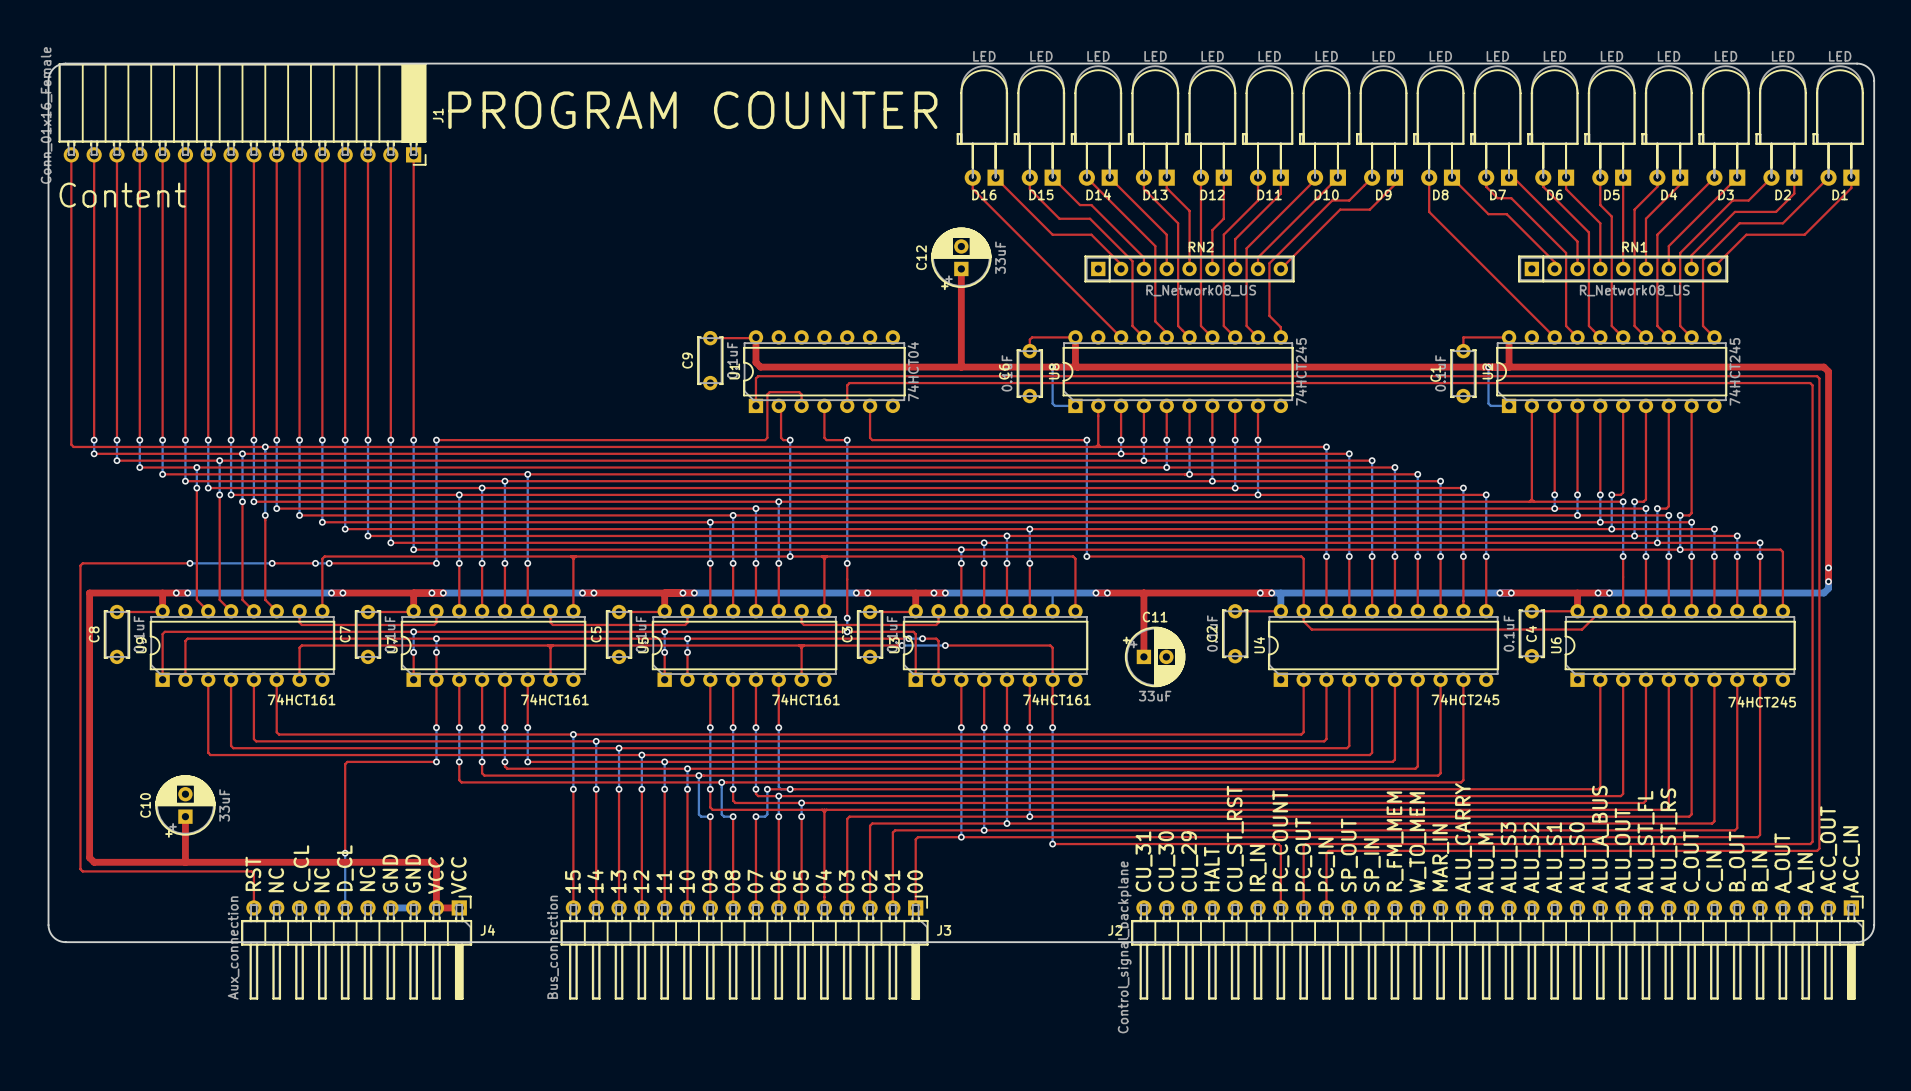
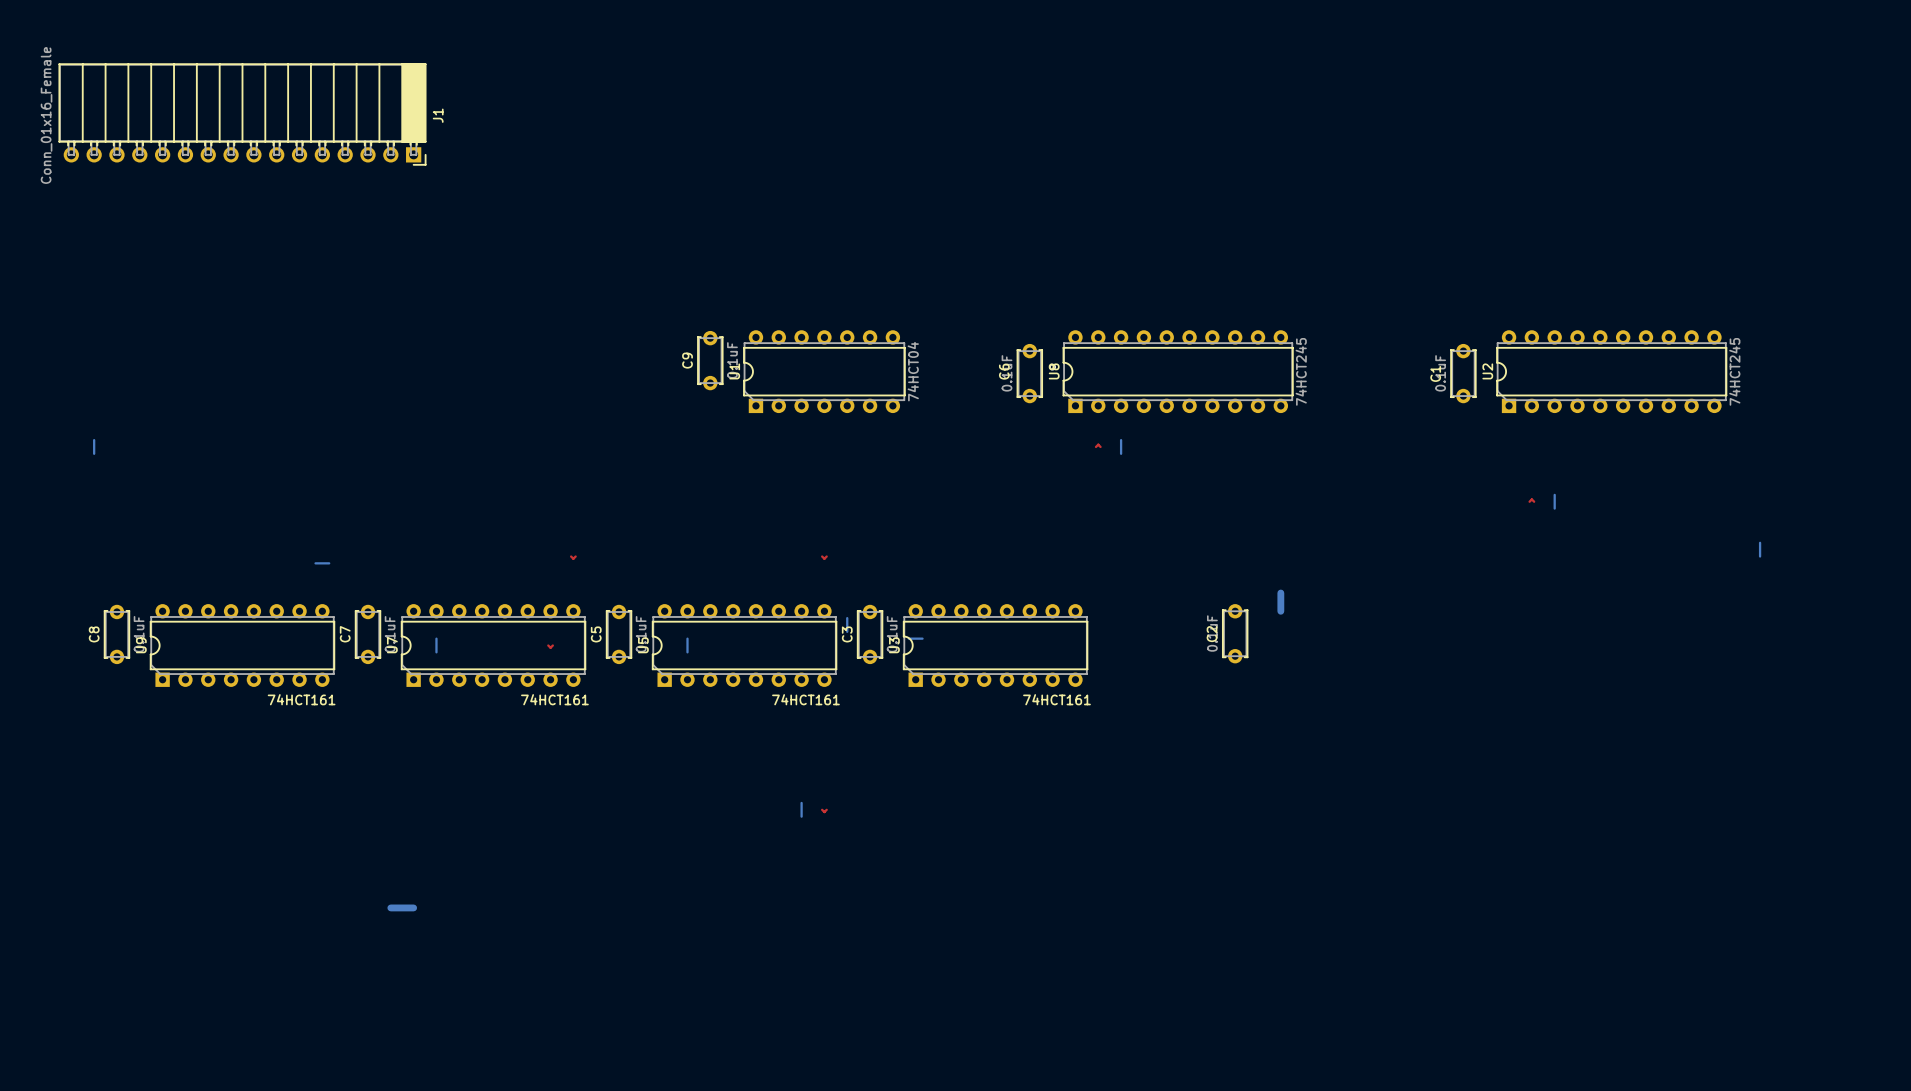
board edge: (65, 63) (1863, 64) (1871, 72) (1874, 80) (1872, 931) (1867, 938) (1857, 942) (59, 940) (52, 935) (48, 925) (48, 80) (53, 68) (65, 63) -> none
text: PROGRAM COUNTER (692, 110) -> none
D16: LED (982, 125) -> none
D15: LED (1039, 125) -> none
D14: LED (1096, 125) -> none
D13: LED (1153, 125) -> none
D12: LED (1210, 125) -> none
D11: LED (1267, 125) -> none
D10: LED (1324, 125) -> none
D9: LED (1381, 125) -> none
D8: LED (1438, 125) -> none
D7: LED (1495, 125) -> none
D6: LED (1552, 125) -> none
D5: LED (1609, 125) -> none
D4: LED (1666, 125) -> none
D3: LED (1724, 125) -> none
D2: LED (1781, 125) -> none
D1: LED (1838, 125) -> none
top track: (71, 154) (71, 444) (73, 446) (1326, 446) -> none
top track: (94, 154) (94, 440) -> none
top track: (116, 154) (116, 440) -> none
top track: (139, 154) (139, 440) -> none
top track: (162, 154) (162, 440) -> none
top track: (185, 154) (185, 440) -> none
top track: (208, 154) (208, 440) -> none
top track: (231, 154) (231, 440) -> none
top track: (253, 154) (253, 440) -> none
top track: (276, 154) (276, 440) -> none
top track: (299, 154) (299, 440) -> none
top track: (322, 154) (322, 440) -> none
top track: (345, 154) (345, 440) -> none
top track: (368, 154) (368, 440) -> none
top track: (390, 154) (390, 440) -> none
top track: (413, 154) (413, 440) -> none
top track: (1337, 175) (1337, 177) (1258, 257) (1258, 268) -> none
top track: (972, 177) (972, 189) (1121, 337) -> none
top track: (995, 177) (1052, 234) (1091, 234) (1121, 264) (1121, 268) -> none
top track: (1029, 177) (1029, 189) (1059, 218) (1090, 218) (1132, 261) (1132, 326) (1143, 337) -> none
top track: (1052, 177) (1080, 205) (1091, 205) (1143, 257) (1143, 268) -> none
top track: (1086, 177) (1155, 246) (1155, 321) (1166, 335) -> none
top track: (1109, 177) (1166, 234) (1166, 268) -> none
top track: (1143, 177) (1143, 189) (1178, 223) (1178, 326) (1189, 337) -> none
top track: (1166, 177) (1166, 188) (1189, 210) (1189, 268) -> none
top track: (1200, 177) (1200, 326) (1212, 337) -> none
top track: (1223, 177) (1223, 218) (1212, 230) (1212, 268) -> none
top track: (1258, 177) (1258, 200) (1223, 234) (1223, 326) (1235, 337) -> none
top track: (1280, 177) (1280, 193) (1235, 239) (1235, 268) -> none
top track: (1315, 177) (1315, 179) (1246, 248) (1246, 326) (1258, 337) -> none
top track: (1372, 177) (1349, 200) (1332, 200) (1269, 263) (1269, 315) (1280, 327) (1280, 337) -> none
top track: (1394, 177) (1394, 184) (1369, 209) (1340, 209) (1280, 268) -> none
top track: (1429, 177) (1429, 211) (1554, 337) -> none
top track: (1451, 177) (1488, 214) (1506, 214) (1554, 262) (1554, 268) -> none
top track: (1486, 177) (1486, 186) (1497, 198) (1511, 198) (1566, 252) (1566, 326) (1577, 337) -> none
top track: (1509, 177) (1513, 177) (1577, 241) (1577, 268) -> none
top track: (1543, 177) (1543, 186) (1588, 232) (1588, 326) (1600, 337) -> none
top track: (1566, 177) (1566, 189) (1600, 223) (1600, 268) -> none
top track: (1600, 177) (1600, 205) (1611, 216) (1611, 326) (1623, 337) -> none
top track: (1623, 177) (1623, 266) -> none
top track: (1657, 177) (1657, 186) (1634, 209) (1634, 326) (1645, 337) -> none
top track: (1714, 177) (1657, 234) (1657, 326) (1668, 337) -> none
top track: (1737, 177) (1668, 246) (1668, 268) -> none
top track: (1771, 177) (1748, 200) (1732, 200) (1680, 252) (1680, 326) (1691, 337) -> none
top track: (1794, 177) (1794, 193) (1776, 211) (1734, 211) (1691, 255) (1691, 268) -> none
top track: (1828, 177) (1782, 223) (1739, 223) (1703, 259) (1703, 326) (1714, 337) -> none
top track: (1851, 177) (1851, 188) (1804, 234) (1746, 234) (1714, 266) (1714, 268) -> none
top track: (1680, 179) (1680, 184) (1645, 218) (1645, 268) -> none
text: Content (122, 195) -> none
C12: 33uF (961, 258) -> none
top track: (961, 268) (961, 367) -> none
RN2: R_Network08_US (1189, 268) -> none
RN1: R_Network08_US (1623, 268) -> none
top track: (1509, 337) (1509, 367) -> none
top track: (1511, 337) (1463, 337) (1463, 351) -> none
top track: (710, 338) (755, 337) (755, 362) (760, 367) (1823, 367) (1828, 371) (1828, 581) -> none
top track: (1029, 351) (1029, 339) (1032, 337) (1075, 337) (1075, 364) (1077, 367) -> none
bottom track: (1052, 367) (1052, 403) (1054, 405) (1075, 405) -> none
bottom track: (1488, 367) (1488, 403) (1490, 405) (1509, 405) -> none
via: (1488, 367) -> none
top track: (755, 405) (755, 378) (758, 376) (1817, 376) (1819, 378) (1819, 848) (1817, 850) (1328, 850) (1326, 853) (1326, 907) -> none
top track: (778, 405) (781, 408) (781, 437) (783, 440) (790, 440) -> none
top track: (801, 405) (801, 394) (799, 392) (769, 392) (767, 394) (767, 437) (765, 440) (436, 440) -> none
top track: (824, 405) (824, 437) (826, 440) (847, 440) -> none
top track: (847, 405) (847, 385) (849, 383) (1810, 383) (1812, 385) (1812, 841) (1810, 844) (1305, 844) (1303, 846) (1303, 907) -> none
top track: (870, 405) (870, 437) (872, 440) (1086, 440) -> none
top track: (1098, 405) (1098, 446) -> none
top track: (1121, 405) (1121, 440) -> none
top track: (1143, 405) (1143, 440) -> none
top track: (1166, 405) (1166, 440) -> none
top track: (1189, 405) (1189, 440) -> none
top track: (1212, 405) (1212, 440) -> none
top track: (1235, 405) (1235, 440) -> none
top track: (1258, 405) (1258, 440) -> none
top track: (1554, 405) (1554, 494) -> none
top track: (1577, 405) (1577, 494) -> none
top track: (1600, 405) (1600, 494) -> none
top track: (1623, 405) (1623, 492) (1620, 494) (1611, 494) -> none
top track: (1645, 405) (1645, 499) (1643, 501) (1634, 501) -> none
top track: (1668, 405) (1668, 506) (1666, 508) (1657, 508) -> none
top track: (1691, 405) (1691, 513) (1689, 515) (1680, 515) -> none
top track: (1531, 408) (1531, 499) -> none
via: (94, 440) -> none
bottom track: (116, 440) (116, 460) -> none
via: (116, 440) -> none
bottom track: (139, 440) (139, 467) -> none
via: (139, 440) -> none
bottom track: (162, 440) (162, 474) -> none
via: (162, 440) -> none
bottom track: (185, 440) (185, 481) -> none
via: (185, 440) -> none
bottom track: (208, 440) (208, 488) -> none
via: (208, 440) -> none
bottom track: (231, 440) (231, 494) -> none
via: (231, 440) -> none
bottom track: (253, 440) (253, 501) -> none
via: (253, 440) -> none
bottom track: (276, 440) (276, 508) -> none
via: (276, 440) -> none
bottom track: (299, 440) (299, 515) -> none
via: (299, 440) -> none
bottom track: (322, 440) (322, 522) -> none
via: (322, 440) -> none
bottom track: (345, 440) (345, 529) -> none
via: (345, 440) -> none
bottom track: (368, 440) (368, 535) -> none
via: (368, 440) -> none
bottom track: (390, 440) (390, 542) -> none
via: (390, 440) -> none
bottom track: (413, 440) (413, 549) -> none
via: (413, 440) -> none
bottom track: (436, 440) (436, 563) -> none
via: (436, 440) -> none
bottom track: (790, 440) (790, 556) -> none
via: (790, 440) -> none
bottom track: (847, 440) (847, 563) -> none
via: (847, 440) -> none
bottom track: (1086, 440) (1086, 556) -> none
via: (1086, 440) -> none
via: (1121, 440) -> none
bottom track: (1143, 440) (1143, 460) -> none
via: (1143, 440) -> none
bottom track: (1166, 440) (1166, 467) -> none
via: (1166, 440) -> none
bottom track: (1189, 440) (1189, 474) -> none
via: (1189, 440) -> none
bottom track: (1212, 440) (1212, 481) -> none
via: (1212, 440) -> none
bottom track: (1235, 440) (1235, 488) -> none
via: (1235, 440) -> none
bottom track: (1258, 440) (1258, 494) -> none
via: (1258, 440) -> none
bottom track: (265, 446) (265, 515) -> none
via: (265, 446) -> none
bottom track: (1326, 446) (1326, 556) -> none
via: (1326, 446) -> none
top track: (94, 453) (1349, 453) -> none
via: (94, 453) -> none
bottom track: (242, 453) (242, 501) -> none
via: (242, 453) -> none
via: (1121, 453) -> none
bottom track: (1349, 453) (1349, 556) -> none
via: (1349, 453) -> none
top track: (116, 460) (1372, 460) -> none
via: (116, 460) -> none
bottom track: (219, 460) (219, 494) -> none
via: (219, 460) -> none
via: (1143, 460) -> none
bottom track: (1372, 460) (1372, 556) -> none
via: (1372, 460) -> none
top track: (139, 467) (1394, 467) -> none
via: (139, 467) -> none
bottom track: (196, 467) (196, 488) -> none
via: (196, 467) -> none
via: (1166, 467) -> none
bottom track: (1394, 467) (1394, 556) -> none
via: (1394, 467) -> none
top track: (162, 474) (1417, 474) -> none
via: (162, 474) -> none
bottom track: (527, 474) (527, 563) -> none
via: (527, 474) -> none
via: (1189, 474) -> none
bottom track: (1417, 474) (1417, 556) -> none
via: (1417, 474) -> none
top track: (185, 481) (1440, 481) -> none
via: (185, 481) -> none
bottom track: (504, 481) (504, 563) -> none
via: (504, 481) -> none
via: (1212, 481) -> none
bottom track: (1440, 481) (1440, 556) -> none
via: (1440, 481) -> none
top track: (196, 488) (196, 599) (208, 611) -> none
via: (196, 488) -> none
top track: (208, 488) (1463, 488) -> none
via: (208, 488) -> none
bottom track: (482, 488) (482, 563) -> none
via: (482, 488) -> none
via: (1235, 488) -> none
bottom track: (1463, 488) (1463, 556) -> none
via: (1463, 488) -> none
top track: (219, 494) (219, 599) (231, 611) -> none
via: (219, 494) -> none
top track: (231, 494) (1486, 494) -> none
via: (231, 494) -> none
bottom track: (459, 494) (459, 563) -> none
via: (459, 494) -> none
via: (1258, 494) -> none
bottom track: (1486, 494) (1486, 556) -> none
via: (1486, 494) -> none
via: (1554, 494) -> none
bottom track: (1577, 494) (1577, 515) -> none
via: (1577, 494) -> none
bottom track: (1600, 494) (1600, 522) -> none
via: (1600, 494) -> none
bottom track: (1611, 494) (1611, 529) -> none
via: (1611, 494) -> none
top track: (242, 501) (242, 599) (253, 611) -> none
via: (242, 501) -> none
top track: (253, 501) (1623, 501) -> none
via: (253, 501) -> none
bottom track: (778, 501) (778, 563) -> none
via: (778, 501) -> none
bottom track: (1623, 501) (1623, 556) -> none
via: (1623, 501) -> none
bottom track: (1634, 501) (1634, 535) -> none
via: (1634, 501) -> none
top track: (276, 508) (1645, 508) -> none
via: (276, 508) -> none
bottom track: (755, 508) (755, 563) -> none
via: (755, 508) -> none
via: (1554, 508) -> none
bottom track: (1645, 508) (1645, 556) -> none
via: (1645, 508) -> none
bottom track: (1657, 508) (1657, 542) -> none
via: (1657, 508) -> none
top track: (265, 515) (265, 599) (276, 611) -> none
via: (265, 515) -> none
top track: (299, 515) (1668, 515) -> none
via: (299, 515) -> none
bottom track: (733, 515) (733, 563) -> none
via: (733, 515) -> none
via: (1577, 515) -> none
bottom track: (1668, 515) (1668, 556) -> none
via: (1668, 515) -> none
bottom track: (1680, 515) (1680, 549) -> none
via: (1680, 515) -> none
top track: (322, 522) (1691, 522) -> none
via: (322, 522) -> none
bottom track: (710, 522) (710, 563) -> none
via: (710, 522) -> none
via: (1600, 522) -> none
bottom track: (1691, 522) (1691, 556) -> none
via: (1691, 522) -> none
top track: (345, 529) (1714, 529) -> none
via: (345, 529) -> none
bottom track: (1029, 529) (1029, 563) -> none
via: (1029, 529) -> none
via: (1611, 529) -> none
bottom track: (1714, 529) (1714, 556) -> none
via: (1714, 529) -> none
top track: (368, 535) (1737, 535) -> none
via: (368, 535) -> none
bottom track: (1006, 535) (1006, 563) -> none
via: (1006, 535) -> none
via: (1634, 535) -> none
bottom track: (1737, 535) (1737, 556) -> none
via: (1737, 535) -> none
top track: (390, 542) (1760, 542) -> none
via: (390, 542) -> none
bottom track: (984, 542) (984, 563) -> none
via: (984, 542) -> none
via: (1657, 542) -> none
via: (1760, 542) -> none
top track: (413, 549) (1780, 549) (1782, 551) (1782, 611) -> none
via: (413, 549) -> none
bottom track: (961, 549) (961, 563) -> none
via: (961, 549) -> none
via: (1680, 549) -> none
top track: (573, 556) (573, 611) -> none
via: (790, 556) -> none
top track: (824, 556) (824, 611) -> none
top track: (1086, 556) (1301, 556) (1303, 558) (1303, 621) (1311, 629) (1582, 629) (1600, 611) -> none
via: (1086, 556) -> none
top track: (1326, 556) (1326, 611) -> none
via: (1326, 556) -> none
top track: (1349, 556) (1349, 611) -> none
via: (1349, 556) -> none
top track: (1372, 556) (1372, 611) -> none
via: (1372, 556) -> none
top track: (1394, 556) (1394, 611) -> none
via: (1394, 556) -> none
top track: (1417, 556) (1417, 611) -> none
via: (1417, 556) -> none
top track: (1440, 556) (1440, 611) -> none
via: (1440, 556) -> none
top track: (1463, 556) (1463, 611) -> none
via: (1463, 556) -> none
top track: (1486, 556) (1486, 611) -> none
via: (1486, 556) -> none
top track: (1623, 556) (1623, 613) -> none
via: (1623, 556) -> none
top track: (1645, 556) (1645, 611) -> none
via: (1645, 556) -> none
top track: (1668, 556) (1668, 611) -> none
via: (1668, 556) -> none
top track: (1691, 556) (1691, 611) -> none
via: (1691, 556) -> none
top track: (1714, 556) (1714, 611) -> none
via: (1714, 556) -> none
top track: (1737, 556) (1737, 611) -> none
via: (1737, 556) -> none
top track: (1760, 556) (1760, 611) -> none
via: (1760, 556) -> none
bottom track: (190, 563) (272, 563) -> none
top track: (190, 563) (82, 563) (80, 565) (80, 869) (82, 871) (251, 871) (253, 873) (253, 907) -> none
via: (190, 563) -> none
top track: (272, 563) (315, 563) -> none
via: (272, 563) -> none
via: (315, 563) -> none
top track: (329, 563) (436, 563) -> none
via: (329, 563) -> none
via: (436, 563) -> none
top track: (459, 563) (459, 611) -> none
via: (459, 563) -> none
top track: (482, 563) (482, 611) -> none
via: (482, 563) -> none
top track: (504, 563) (504, 611) -> none
via: (504, 563) -> none
top track: (527, 563) (527, 611) -> none
via: (527, 563) -> none
top track: (710, 563) (710, 611) -> none
via: (710, 563) -> none
top track: (733, 563) (733, 611) -> none
via: (733, 563) -> none
top track: (755, 563) (755, 611) -> none
via: (755, 563) -> none
top track: (778, 563) (778, 611) -> none
via: (778, 563) -> none
top track: (847, 563) (847, 618) -> none
via: (847, 563) -> none
top track: (961, 563) (961, 611) -> none
via: (961, 563) -> none
top track: (984, 563) (984, 611) -> none
via: (984, 563) -> none
top track: (1006, 563) (1006, 611) -> none
via: (1006, 563) -> none
top track: (1029, 563) (1029, 611) -> none
via: (1029, 563) -> none
bottom track: (1828, 567) (1828, 588) (1823, 593) (1598, 593) -> none
via: (1828, 567) -> none
via: (1828, 581) -> none
top track: (162, 593) (161, 611) (116, 611) -> none
bottom track: (176, 593) (342, 593) -> none
via: (176, 593) -> none
top track: (187, 593) (89, 593) (89, 857) (94, 862) (431, 862) (436, 866) (436, 907) (459, 907) -> none
via: (187, 593) -> none
top track: (331, 593) (443, 593) -> none
via: (331, 593) -> none
via: (342, 593) -> none
top track: (413, 593) (412, 611) (368, 611) -> none
bottom track: (431, 593) (593, 593) -> none
via: (431, 593) -> none
via: (443, 593) -> none
top track: (582, 593) (694, 593) -> none
via: (582, 593) -> none
via: (593, 593) -> none
top track: (664, 593) (663, 611) (619, 611) -> none
bottom track: (682, 593) (867, 593) -> none
via: (682, 593) -> none
via: (694, 593) -> none
top track: (856, 593) (945, 593) -> none
via: (856, 593) -> none
via: (867, 593) -> none
top track: (915, 593) (914, 611) (870, 611) -> none
bottom track: (933, 593) (1107, 593) -> none
via: (933, 593) -> none
via: (945, 593) -> none
bottom track: (1052, 593) (1052, 611) -> none
top track: (1095, 593) (1271, 593) -> none
via: (1095, 593) -> none
via: (1107, 593) -> none
top track: (1143, 593) (1143, 656) -> none
bottom track: (1260, 593) (1511, 593) -> none
via: (1260, 593) -> none
via: (1271, 593) -> none
top track: (1499, 593) (1609, 593) -> none
via: (1499, 593) -> none
via: (1511, 593) -> none
top track: (1577, 593) (1577, 611) (1531, 611) -> none
via: (1598, 593) -> none
via: (1609, 593) -> none
top track: (299, 611) (299, 622) (301, 624) (434, 624) (436, 622) (436, 611) -> none
top track: (322, 611) (322, 558) (324, 556) (1073, 556) (1075, 558) (1075, 611) -> none
top track: (550, 611) (550, 622) (552, 624) (685, 624) (687, 622) (687, 611) -> none
top track: (801, 611) (801, 622) (803, 624) (936, 624) (938, 622) (938, 611) -> none
top track: (1235, 611) (1280, 611) -> none
via: (847, 618) -> none
bottom track: (413, 631) (413, 652) -> none
via: (413, 631) -> none
bottom track: (664, 631) (664, 652) -> none
via: (664, 631) -> none
via: (847, 631) -> none
C4: 0.1uF (1531, 633) -> none
via: (436, 638) -> none
via: (687, 638) -> none
top track: (908, 638) (187, 638) (185, 640) (185, 679) -> none
via: (908, 638) -> none
top track: (922, 638) (936, 638) (938, 640) (938, 679) -> none
via: (922, 638) -> none
top track: (550, 645) (550, 679) -> none
top track: (799, 645) (801, 647) (803, 645) -> none
top track: (801, 645) (801, 679) -> none
bottom track: (902, 645) (945, 645) -> none
top track: (902, 645) (301, 645) (299, 647) (299, 679) -> none
via: (902, 645) -> none
top track: (945, 645) (1050, 645) (1052, 647) (1052, 727) -> none
via: (945, 645) -> none
U4: 74HCT245 (1383, 645) -> none
U6: 74HCT245 (1680, 645) -> none
top track: (413, 652) (413, 679) -> none
via: (413, 652) -> none
top track: (436, 652) (436, 727) -> none
via: (436, 652) -> none
top track: (664, 652) (664, 679) -> none
via: (664, 652) -> none
top track: (687, 652) (687, 679) -> none
via: (687, 652) -> none
C11: 33uF (1154, 656) -> none
top track: (253, 677) (253, 739) (256, 741) (1324, 741) (1326, 739) (1326, 679) -> none
top track: (162, 679) (162, 634) (164, 631) (913, 631) (915, 634) (915, 679) -> none
top track: (208, 679) (208, 752) (210, 755) (1369, 755) (1372, 752) (1372, 679) -> none
top track: (231, 679) (231, 745) (233, 748) (1347, 748) (1349, 745) (1349, 679) -> none
top track: (276, 679) (276, 732) (279, 734) (1301, 734) (1303, 732) (1303, 679) -> none
top track: (459, 679) (459, 727) -> none
top track: (482, 679) (482, 727) -> none
top track: (504, 679) (504, 727) -> none
top track: (527, 679) (527, 727) -> none
top track: (710, 679) (710, 727) -> none
top track: (733, 679) (733, 727) -> none
top track: (755, 679) (755, 727) -> none
top track: (778, 679) (778, 727) -> none
top track: (961, 679) (961, 727) -> none
top track: (984, 679) (984, 727) -> none
top track: (1006, 679) (1006, 727) -> none
top track: (1029, 679) (1029, 727) -> none
top track: (1394, 679) (1394, 759) (1392, 761) (527, 761) -> none
top track: (1417, 679) (1417, 766) (1415, 768) (507, 768) (504, 761) -> none
top track: (1440, 679) (1440, 773) (1438, 775) (484, 775) (482, 773) (482, 761) -> none
top track: (1463, 679) (1463, 780) (1461, 782) (461, 782) (459, 780) (459, 761) -> none
top track: (1600, 679) (1600, 786) (1598, 789) (767, 789) -> none
top track: (1623, 679) (1623, 793) (1620, 796) (758, 796) (755, 789) -> none
top track: (1645, 679) (1645, 800) (1643, 802) (735, 802) (733, 800) (733, 789) -> none
top track: (1668, 679) (1668, 807) (1666, 809) (712, 809) (710, 807) (710, 789) -> none
top track: (1691, 679) (1691, 814) (1689, 816) (849, 816) (847, 818) (847, 907) -> none
top track: (1714, 679) (1714, 821) (1712, 823) (872, 823) (870, 825) (870, 907) -> none
top track: (1737, 679) (1737, 828) (1734, 830) (895, 830) (892, 832) (892, 907) -> none
top track: (1760, 679) (1760, 834) (1757, 837) (917, 837) (915, 839) (915, 907) -> none
bottom track: (436, 727) (436, 761) -> none
via: (436, 727) -> none
bottom track: (459, 727) (459, 761) -> none
via: (459, 727) -> none
bottom track: (482, 727) (482, 761) -> none
via: (482, 727) -> none
bottom track: (504, 727) (504, 761) -> none
via: (504, 727) -> none
bottom track: (527, 727) (527, 761) -> none
via: (527, 727) -> none
bottom track: (710, 727) (710, 789) -> none
via: (710, 727) -> none
bottom track: (733, 727) (733, 789) -> none
via: (733, 727) -> none
bottom track: (755, 727) (755, 789) -> none
via: (755, 727) -> none
bottom track: (778, 727) (778, 786) (781, 789) (790, 789) -> none
via: (778, 727) -> none
bottom track: (961, 727) (961, 837) -> none
via: (961, 727) -> none
bottom track: (984, 727) (984, 830) -> none
via: (984, 727) -> none
bottom track: (1006, 727) (1006, 823) -> none
via: (1006, 727) -> none
bottom track: (1029, 727) (1029, 816) -> none
via: (1029, 727) -> none
bottom track: (1052, 727) (1052, 844) -> none
via: (1052, 727) -> none
bottom track: (573, 734) (573, 789) -> none
via: (573, 734) -> none
bottom track: (596, 741) (596, 789) -> none
via: (596, 741) -> none
bottom track: (619, 748) (619, 789) -> none
via: (619, 748) -> none
bottom track: (641, 755) (641, 789) -> none
via: (641, 755) -> none
top track: (436, 761) (347, 761) (345, 764) (345, 853) -> none
via: (436, 761) -> none
via: (459, 761) -> none
via: (482, 761) -> none
via: (504, 761) -> none
via: (527, 761) -> none
bottom track: (664, 761) (664, 789) -> none
via: (664, 761) -> none
bottom track: (687, 768) (687, 789) -> none
via: (687, 768) -> none
bottom track: (698, 775) (698, 814) (701, 816) (710, 816) -> none
via: (698, 775) -> none
bottom track: (721, 782) (721, 814) (724, 816) (733, 816) -> none
via: (721, 782) -> none
top track: (573, 789) (573, 907) -> none
via: (573, 789) -> none
top track: (596, 789) (596, 907) -> none
via: (596, 789) -> none
top track: (619, 789) (619, 907) -> none
via: (619, 789) -> none
top track: (641, 789) (641, 907) -> none
via: (641, 789) -> none
top track: (664, 789) (664, 907) -> none
via: (664, 789) -> none
top track: (687, 789) (687, 907) -> none
via: (687, 789) -> none
via: (710, 789) -> none
via: (733, 789) -> none
via: (755, 789) -> none
bottom track: (767, 789) (767, 814) (765, 816) (755, 816) -> none
via: (767, 789) -> none
via: (790, 789) -> none
bottom track: (778, 796) (778, 816) -> none
via: (778, 796) -> none
via: (801, 802) -> none
C10: 33uF (185, 806) -> none
top track: (824, 809) (824, 907) -> none
top track: (185, 816) (185, 862) -> none
top track: (710, 816) (710, 907) -> none
via: (710, 816) -> none
top track: (733, 816) (733, 907) -> none
via: (733, 816) -> none
top track: (755, 816) (755, 907) -> none
via: (755, 816) -> none
top track: (778, 816) (778, 907) -> none
via: (778, 816) -> none
top track: (801, 816) (801, 907) -> none
via: (801, 816) -> none
via: (1029, 816) -> none
via: (1006, 823) -> none
via: (984, 830) -> none
via: (961, 837) -> none
top track: (1052, 844) (1278, 844) (1280, 846) (1280, 907) -> none
via: (1052, 844) -> none
bottom track: (345, 853) (345, 907) -> none
via: (345, 853) -> none
J4: Aux_connection (356, 947) -> none
J3: Bus_connection (744, 947) -> none
J2: Control_signal_backplane (1497, 947) -> none

